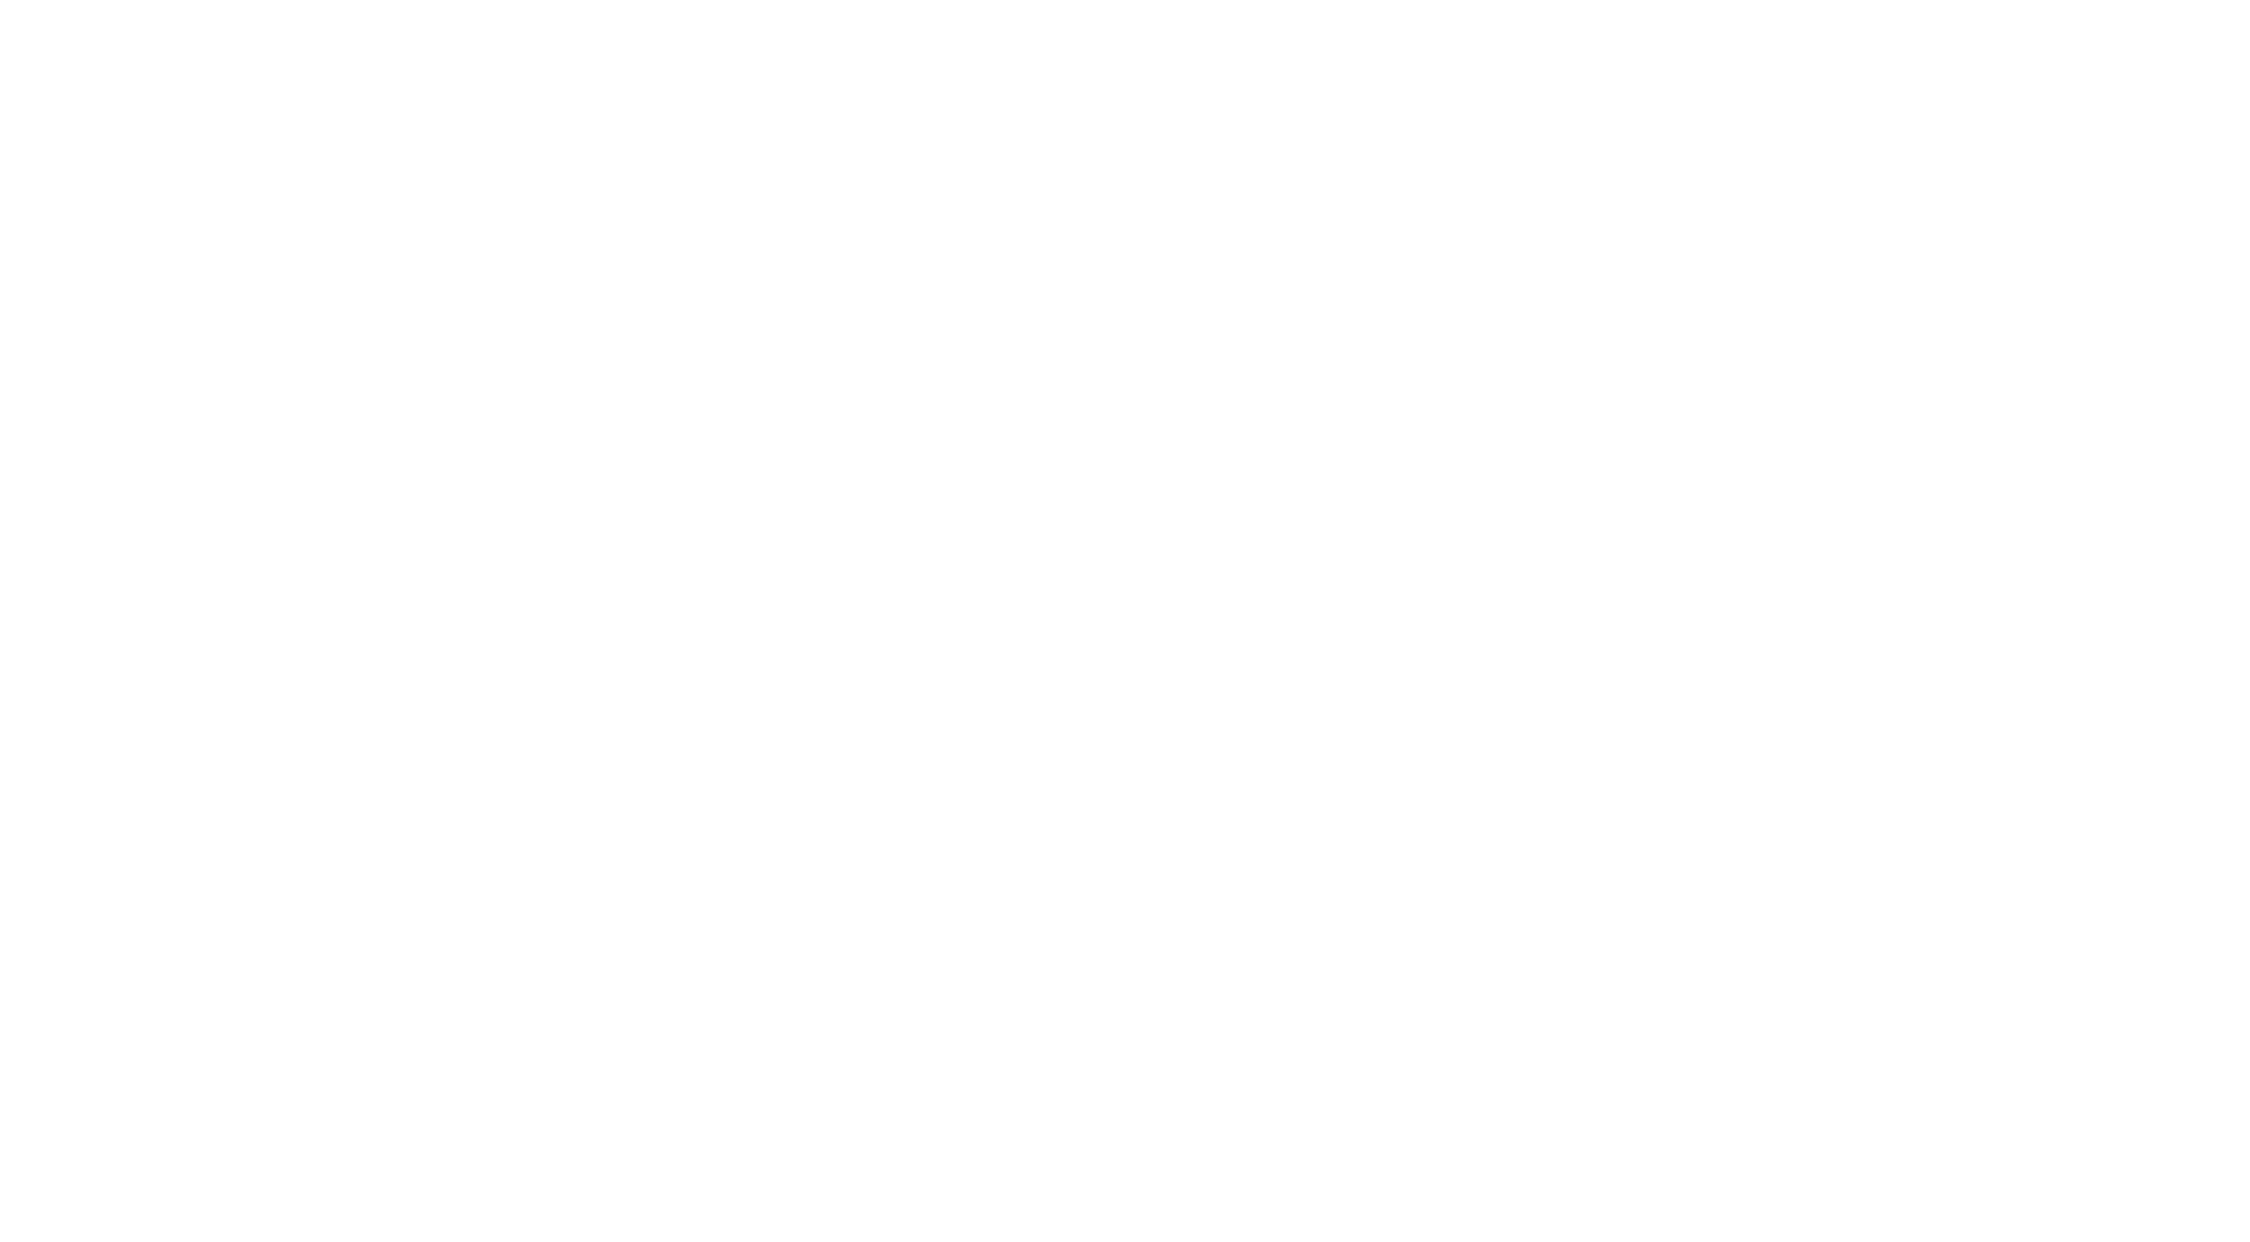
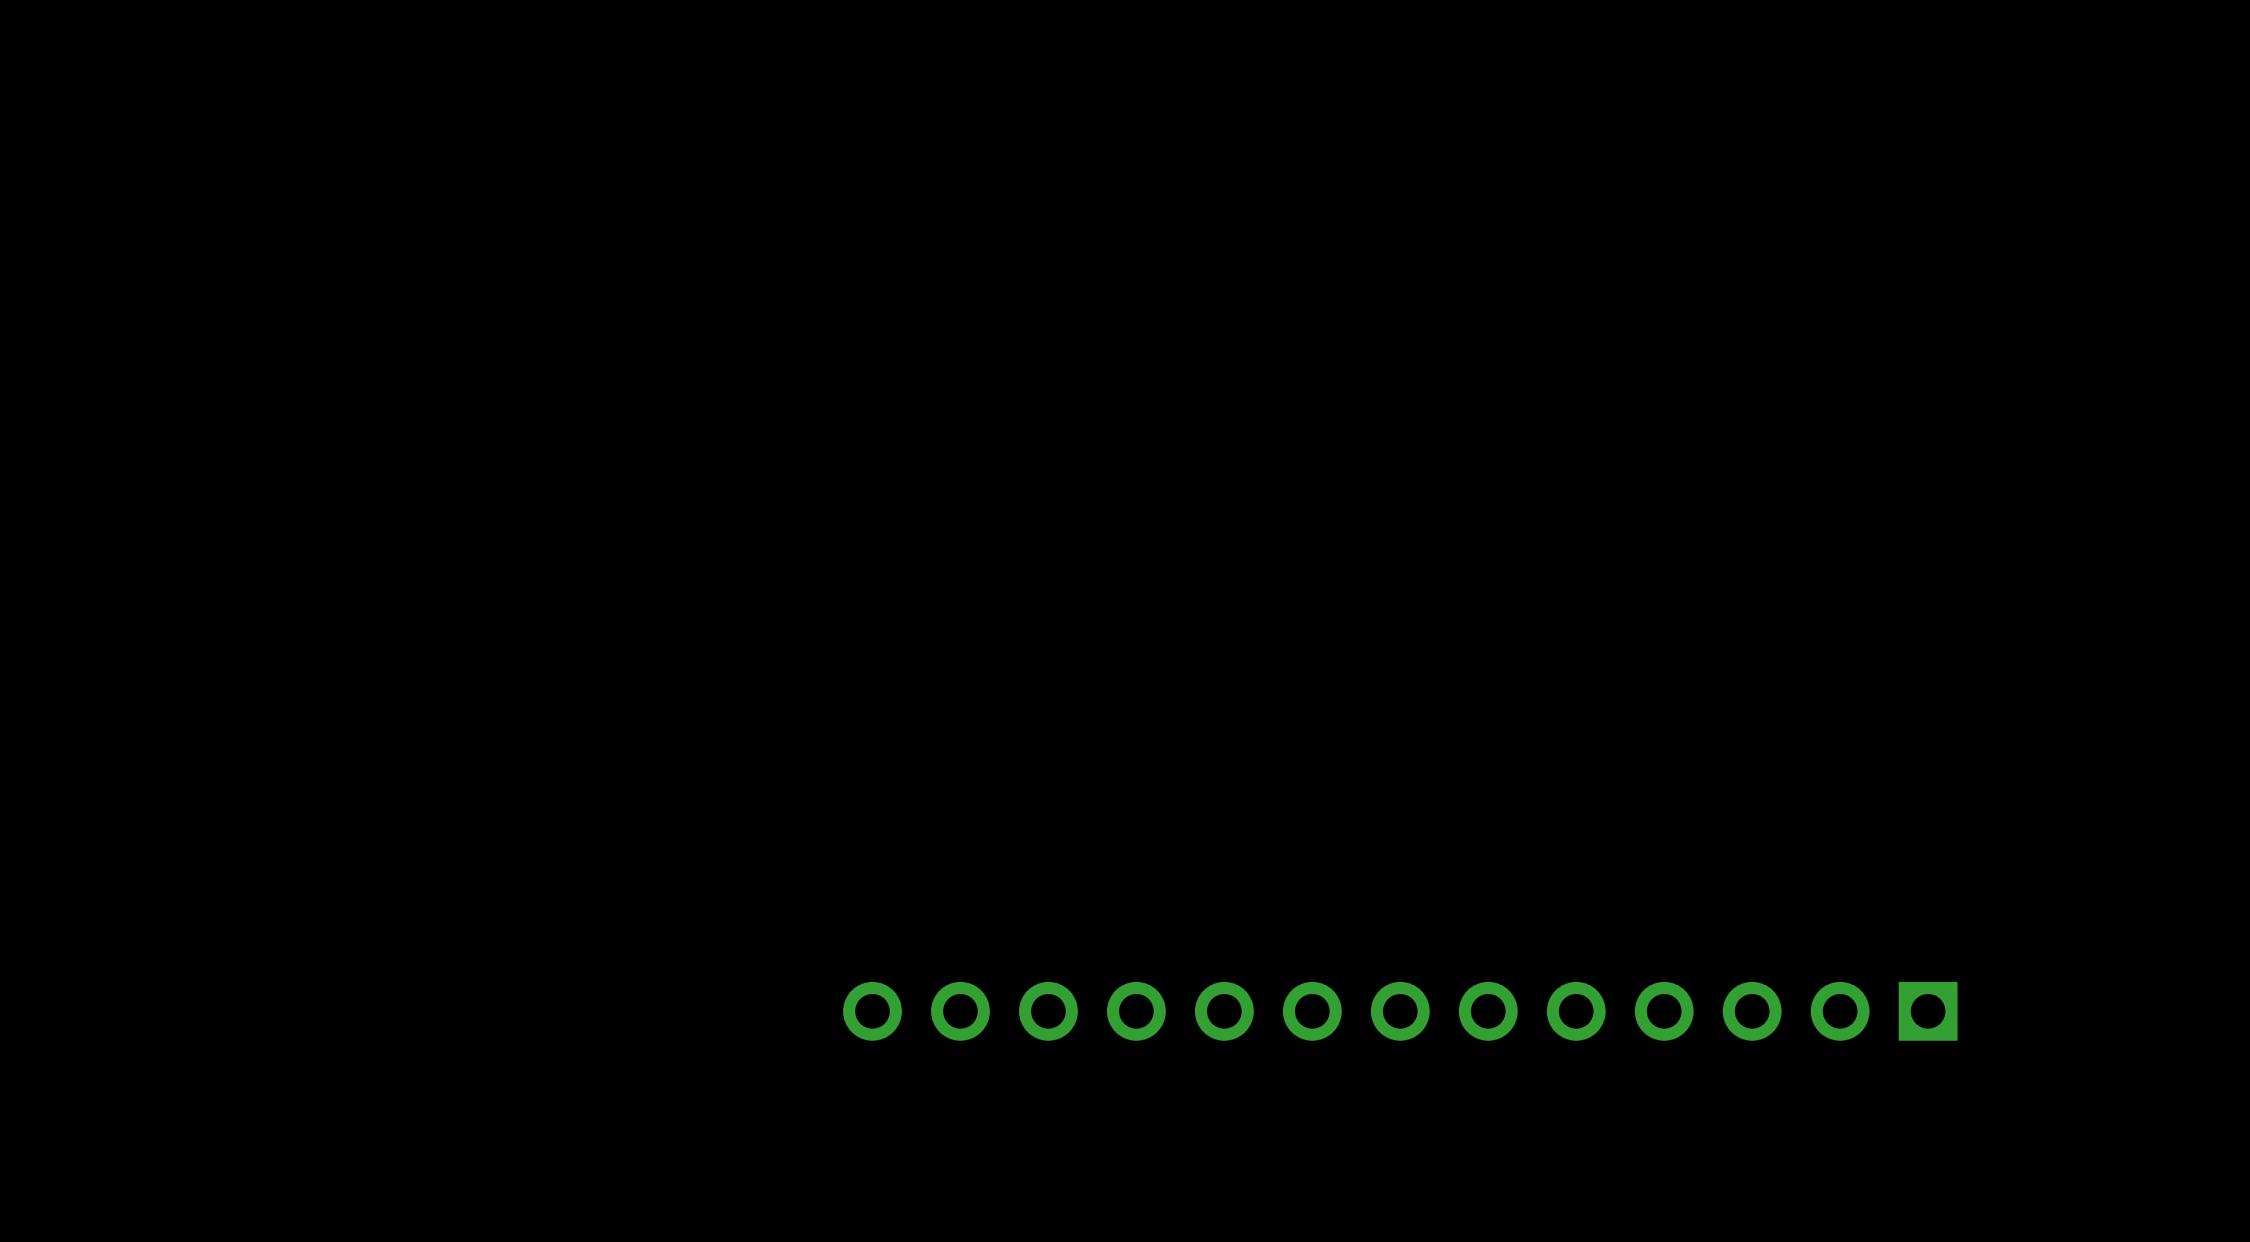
part: none -> (1400, 1011)

